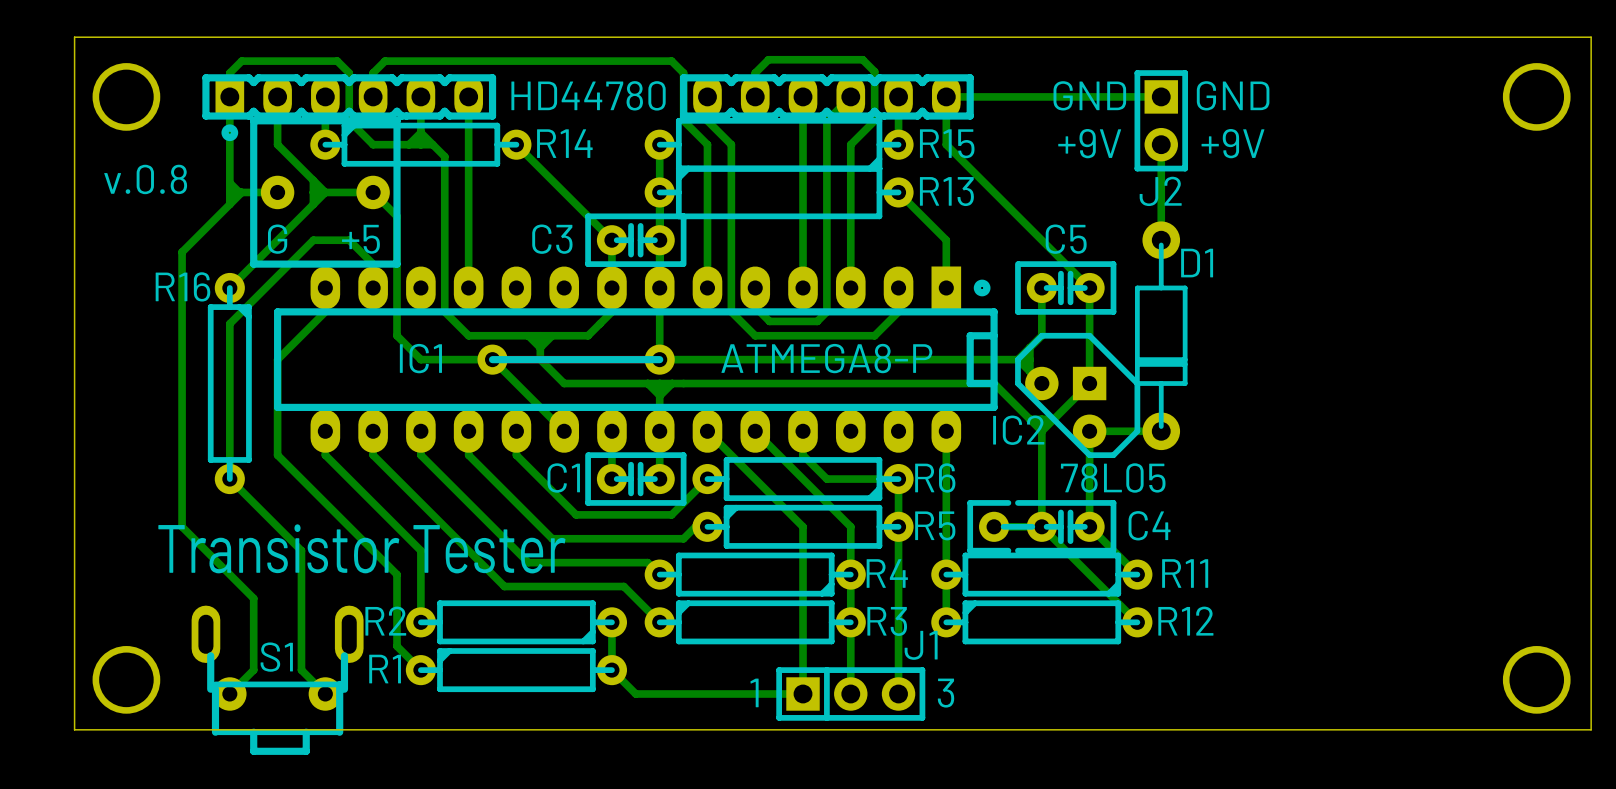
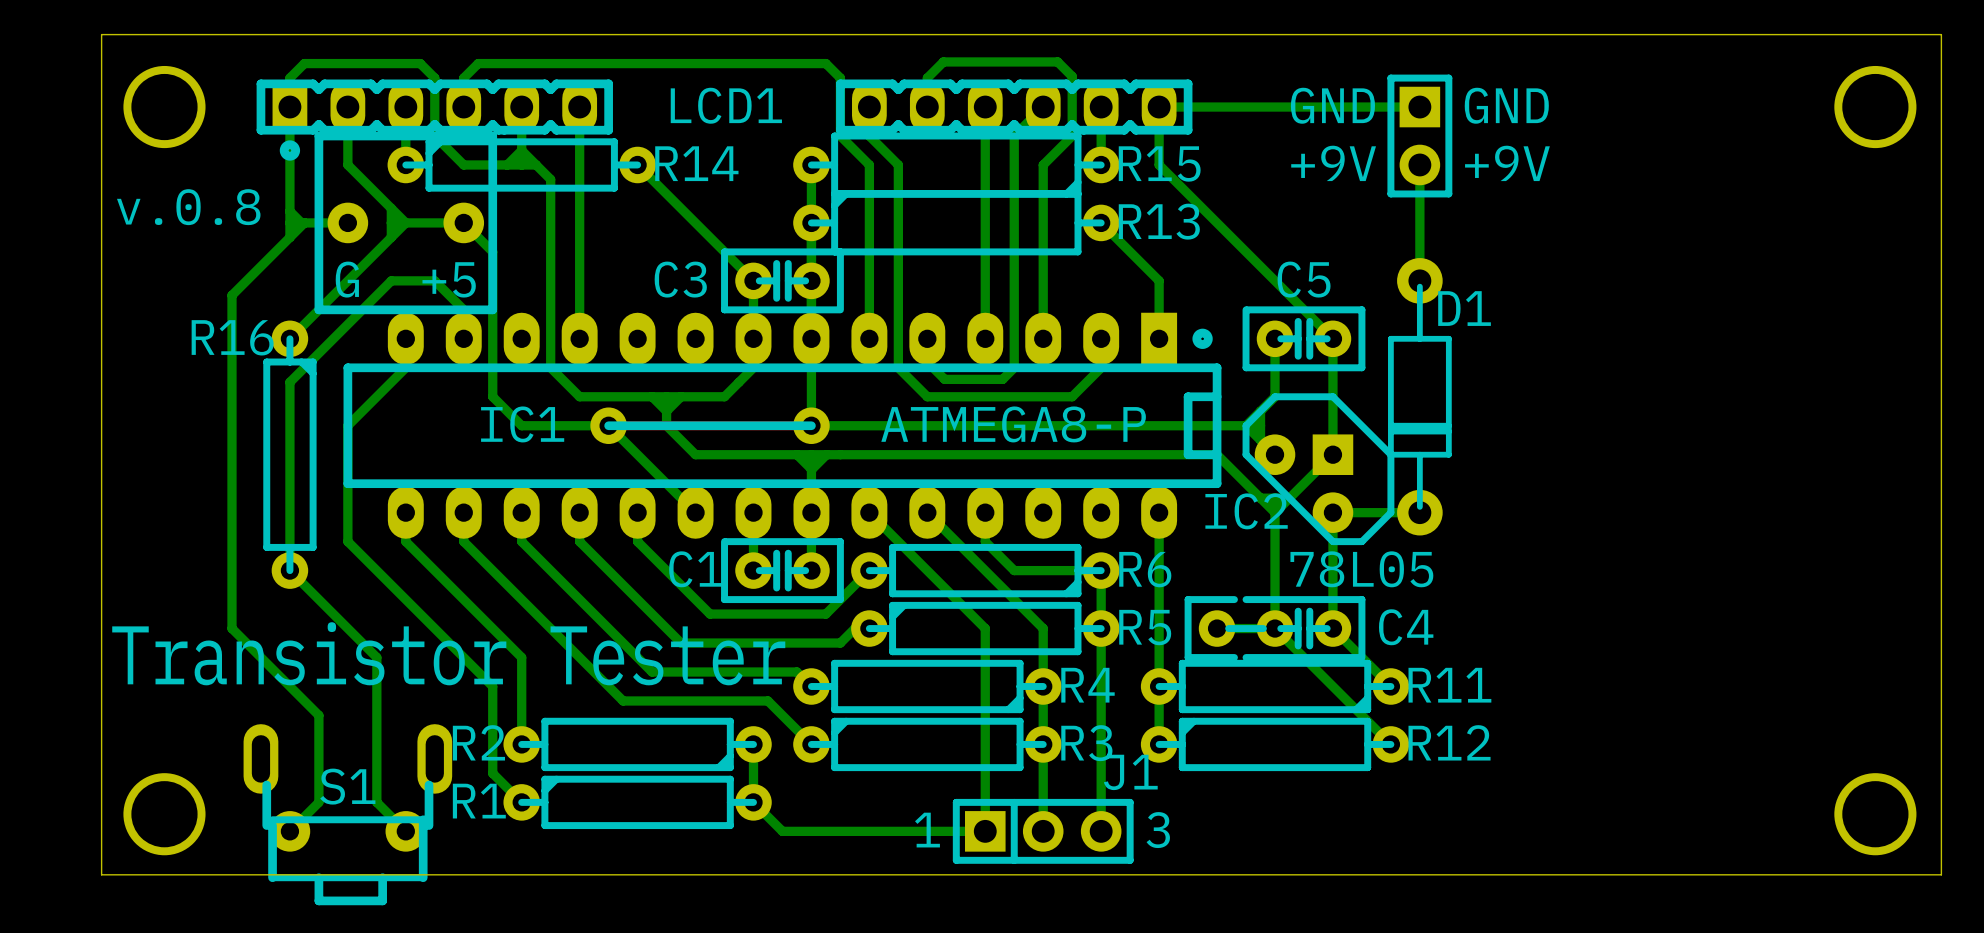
LCD1 name: none -> LCD1 (726, 105)
LCD1 value: HD44780 (588, 95) -> none
J2 name: J2 (1160, 191) -> none

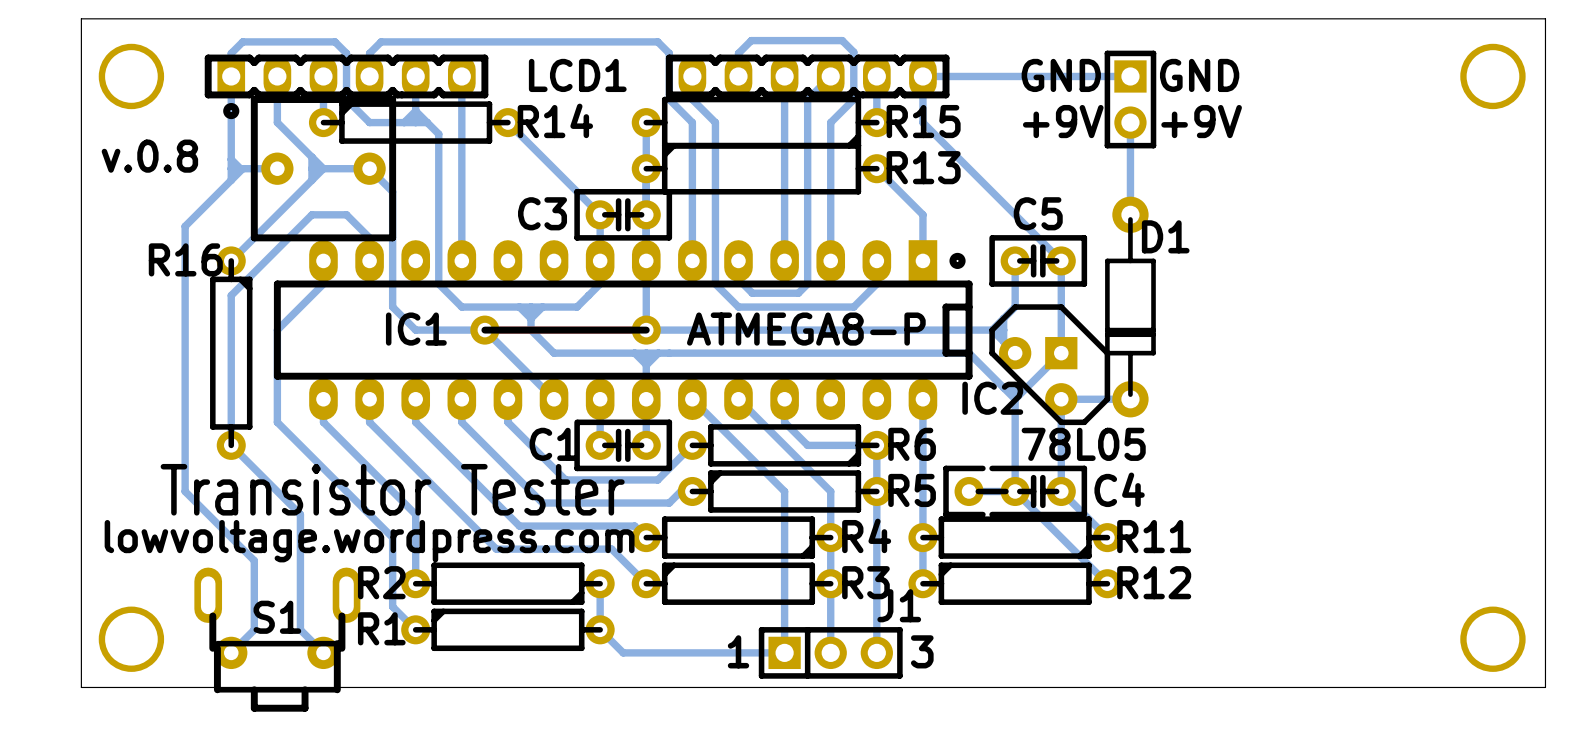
text: G (347, 279) -> none
text: +5 (449, 279) -> none
text position: Transistor Tester (448, 653) -> Transistor Tester (392, 489)
text: none -> lowvoltage.wordpress.com (369, 541)

